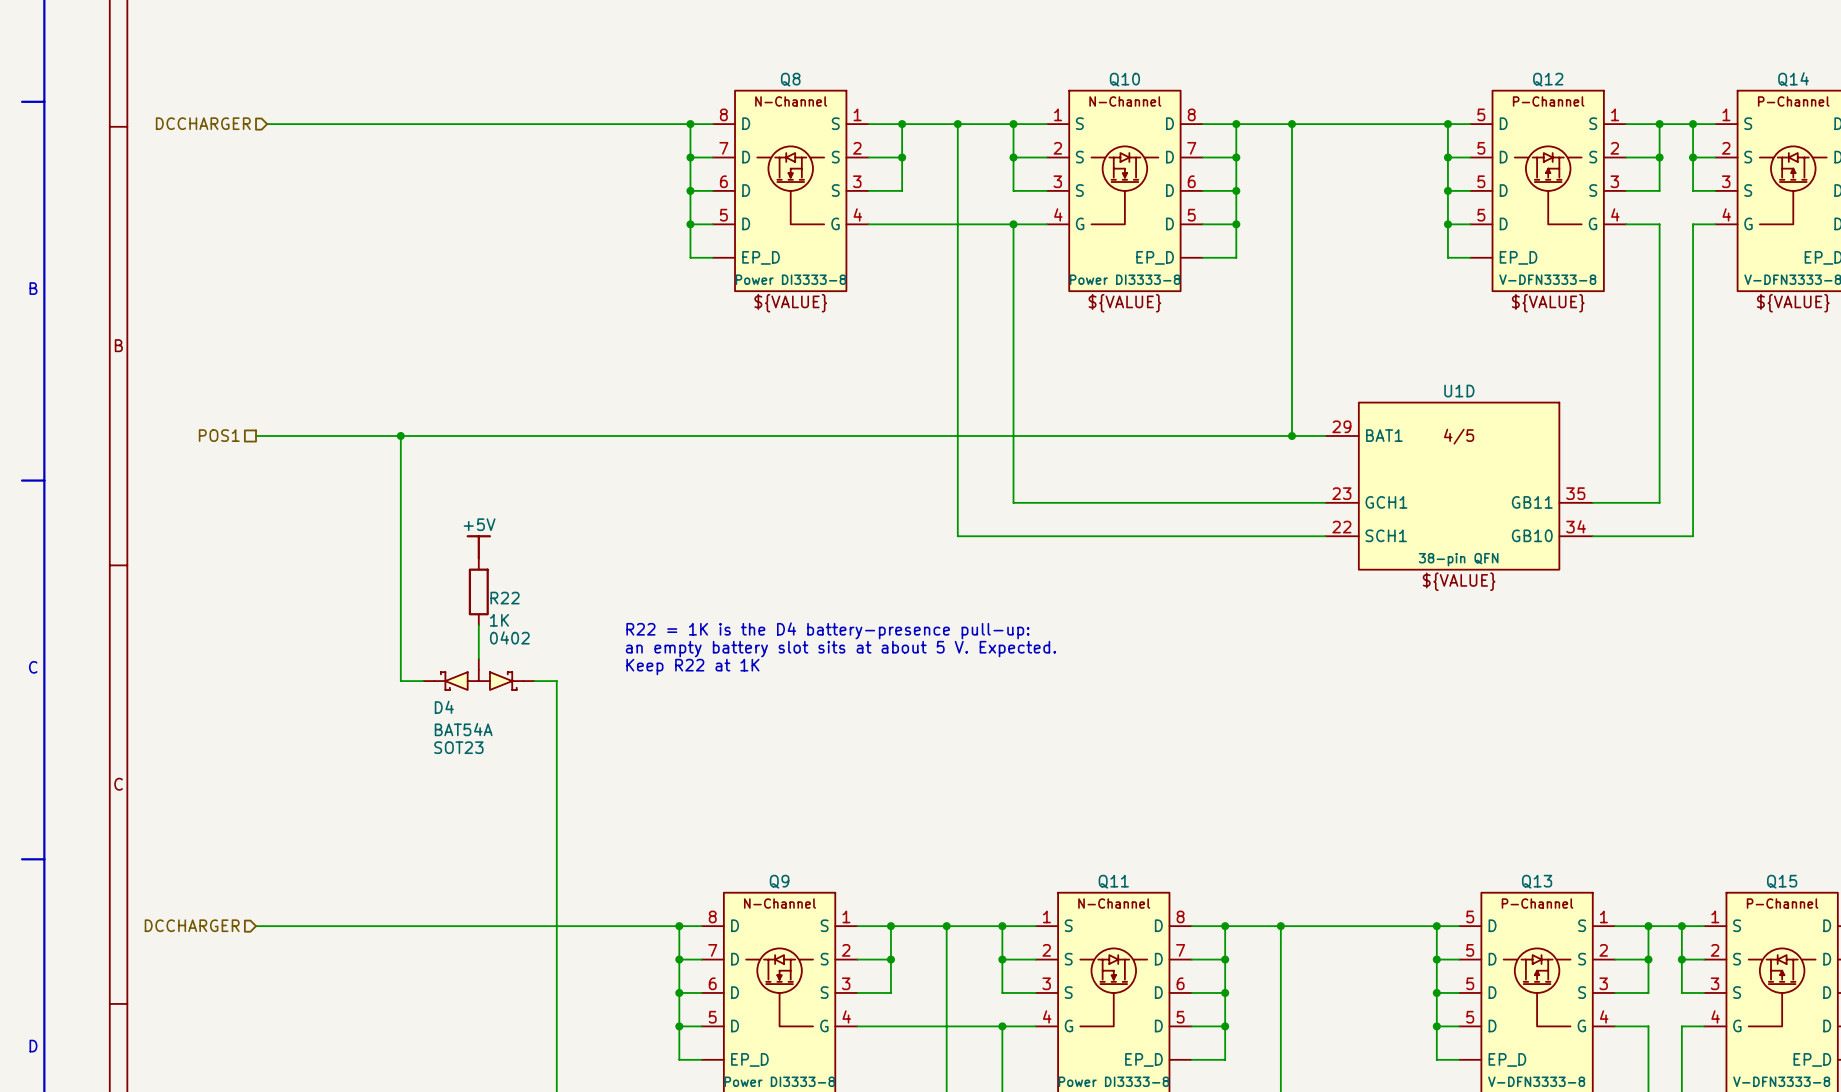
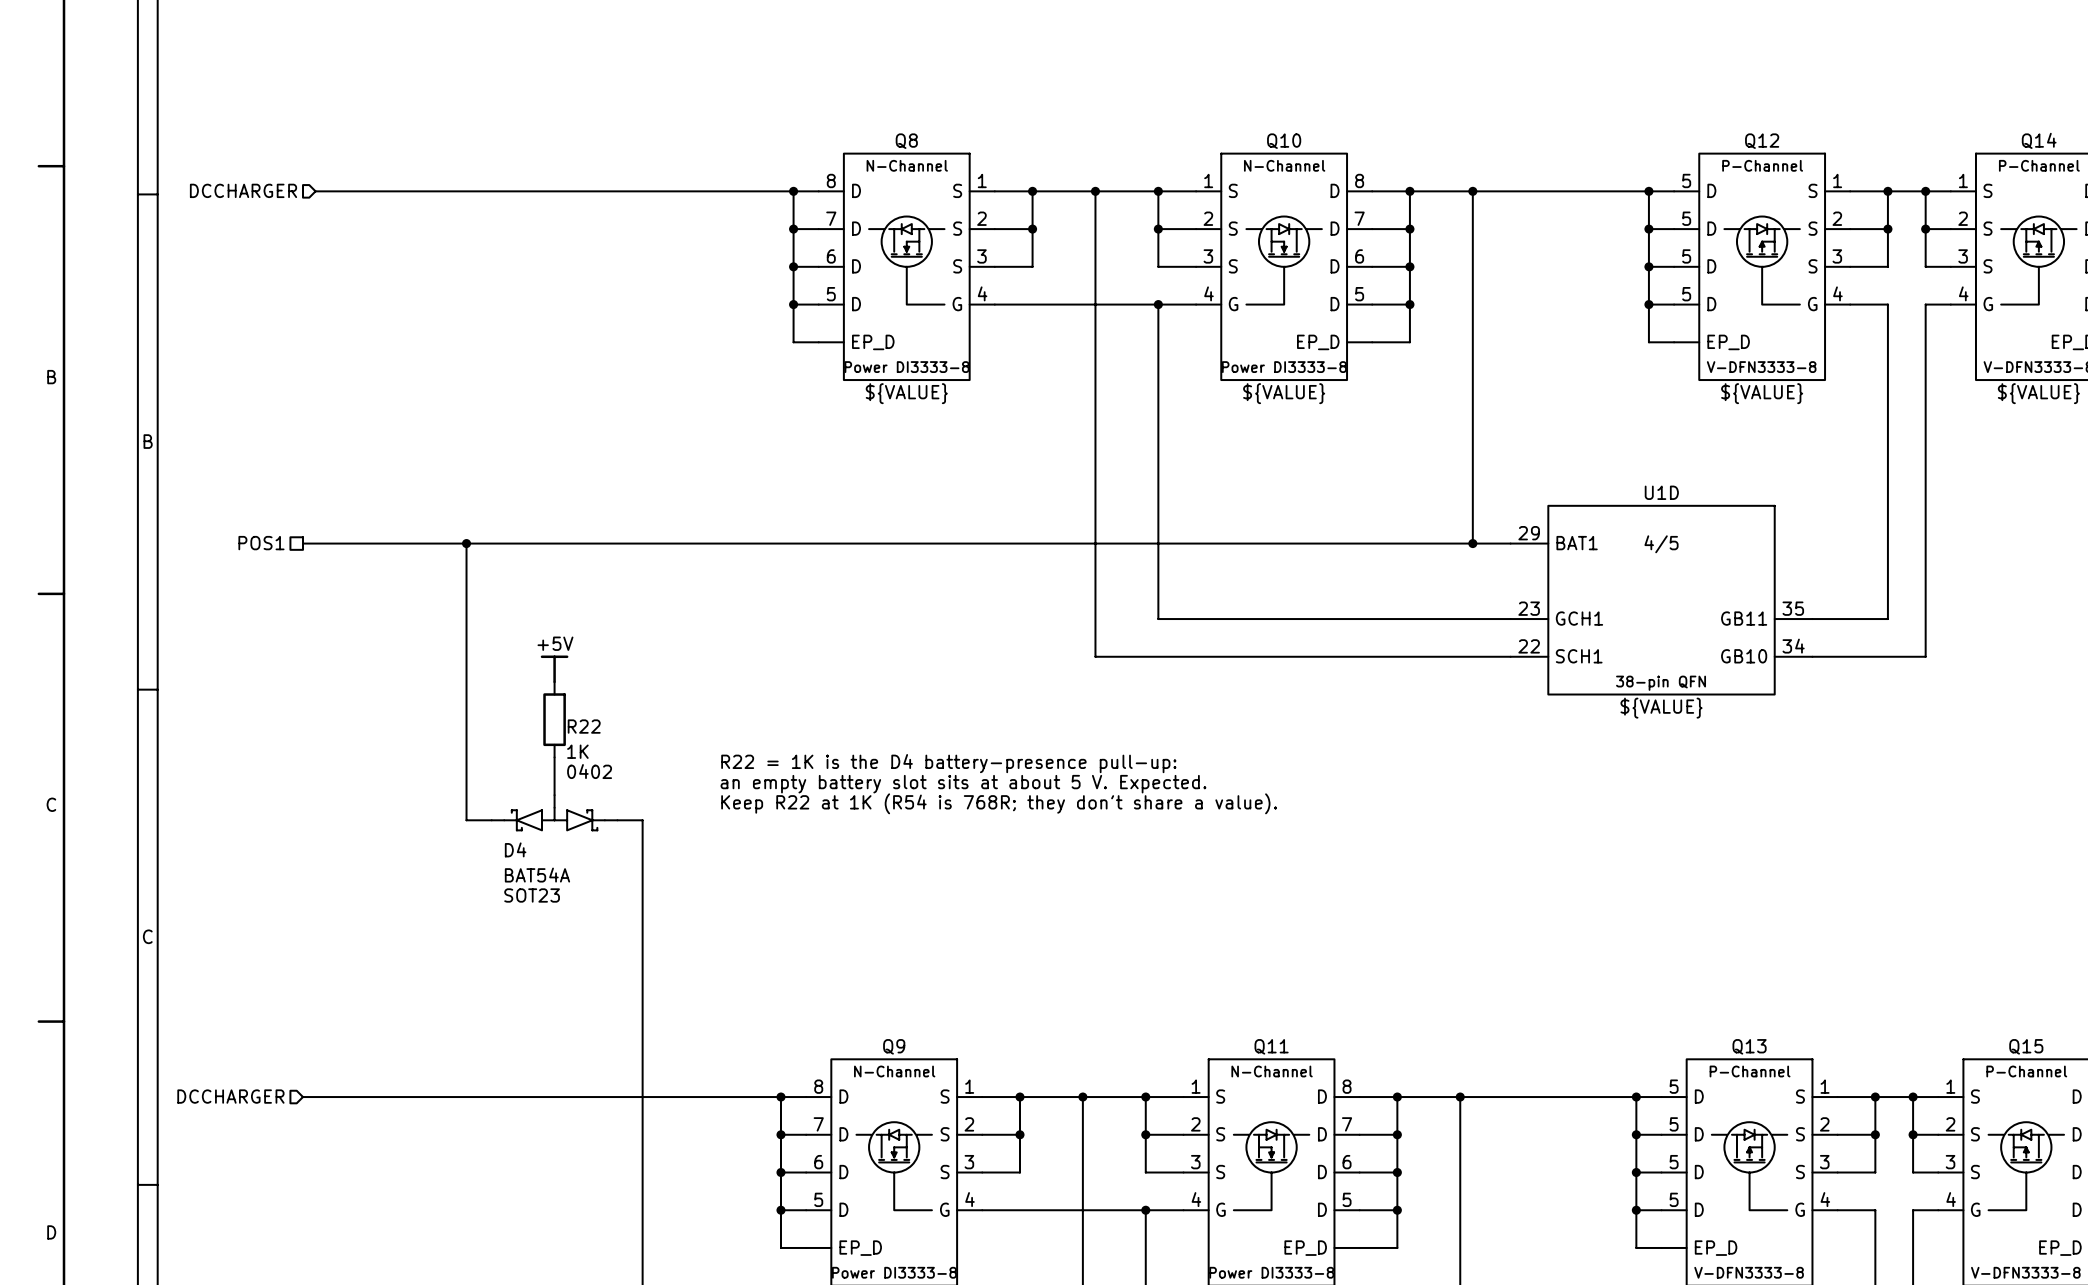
text: Keep R22 at 1K (692, 667) -> Keep R22 at 1K (R54 is 768R; they don't share a value). (999, 803)

